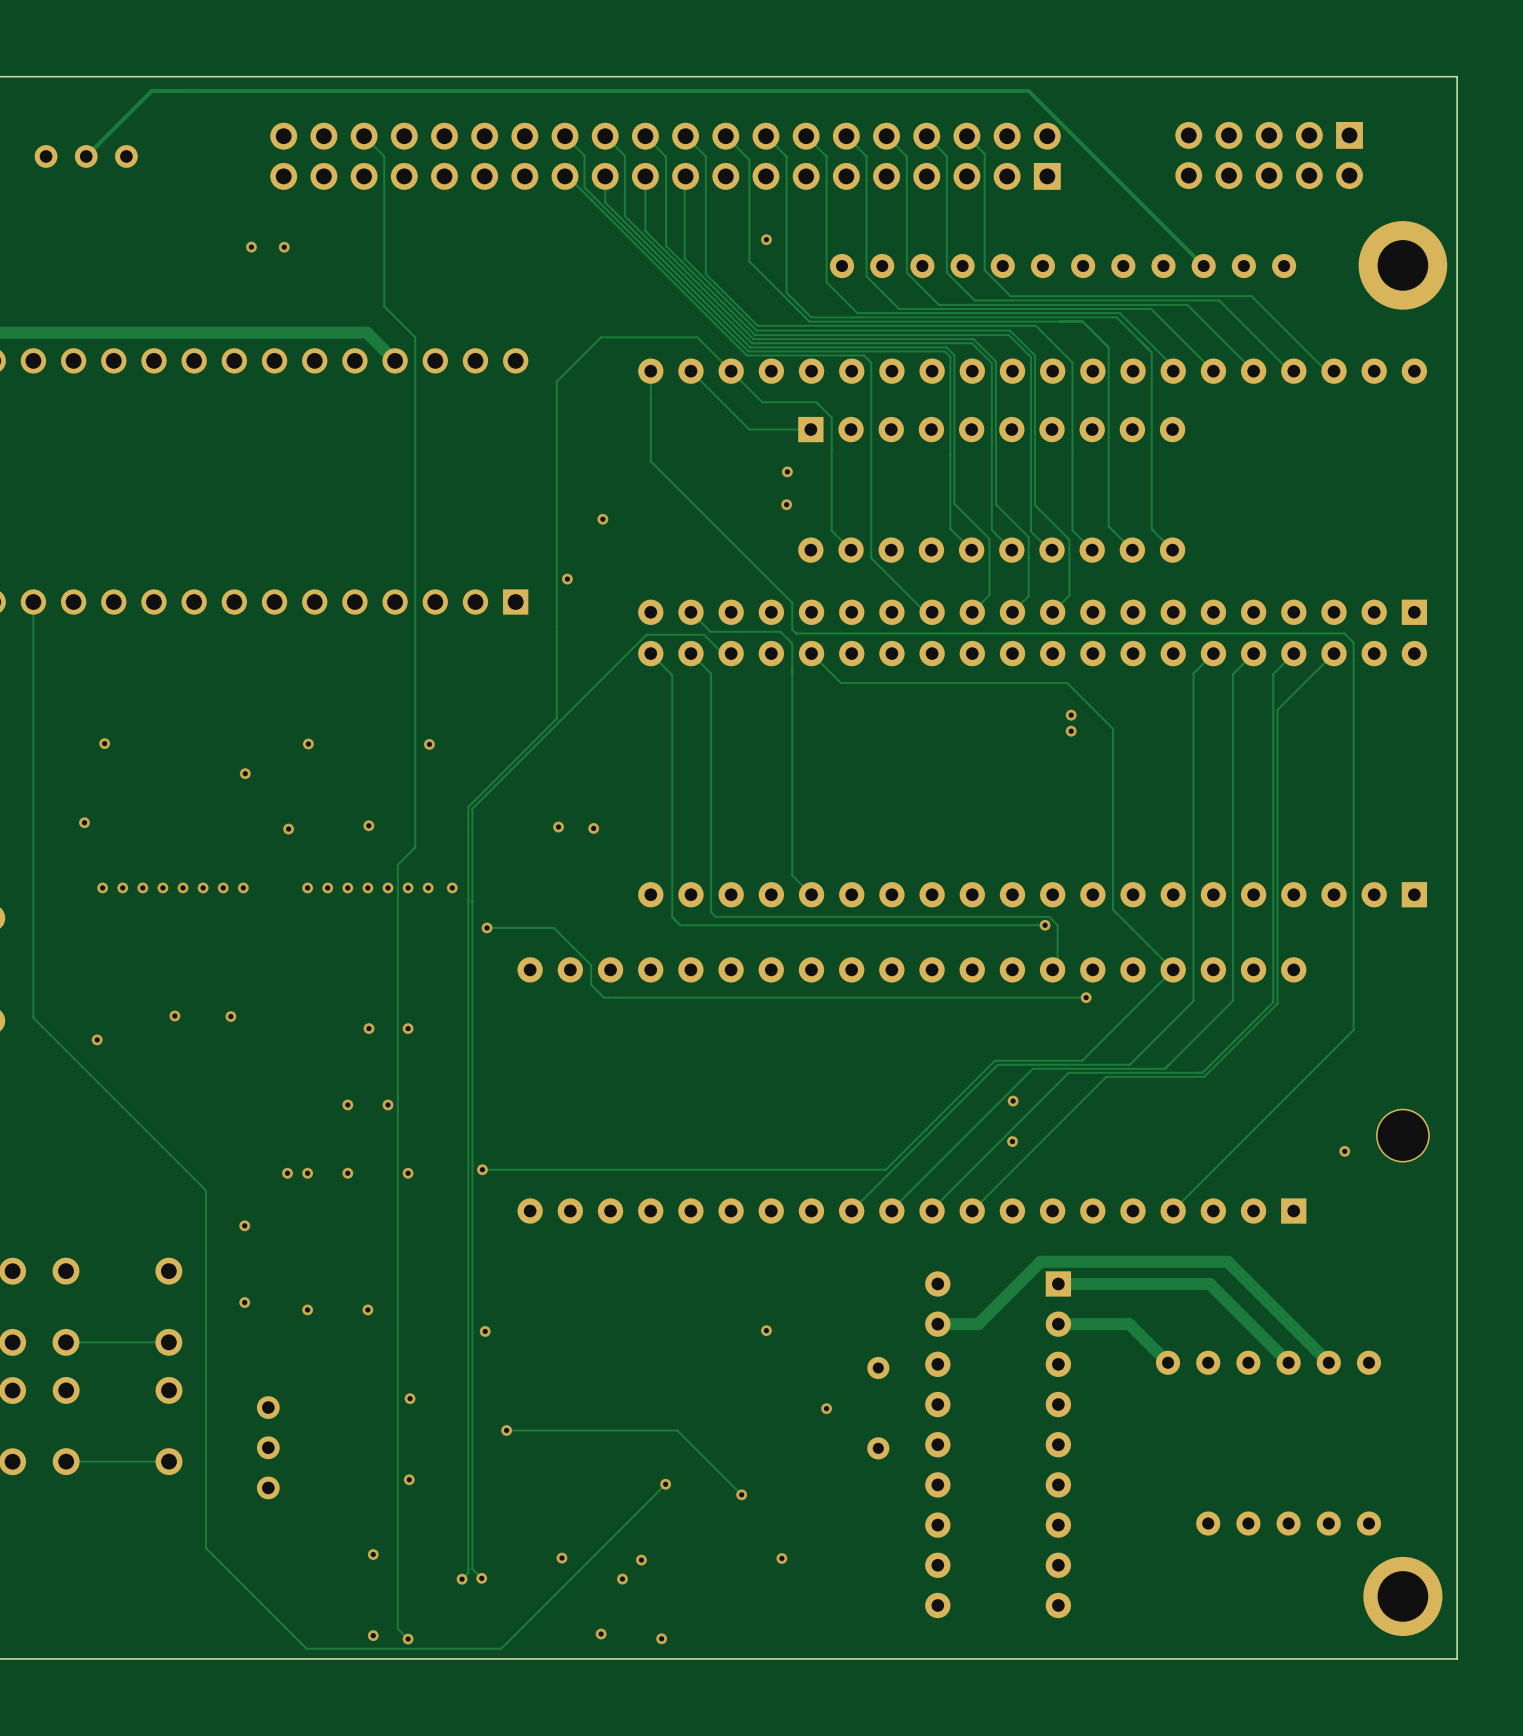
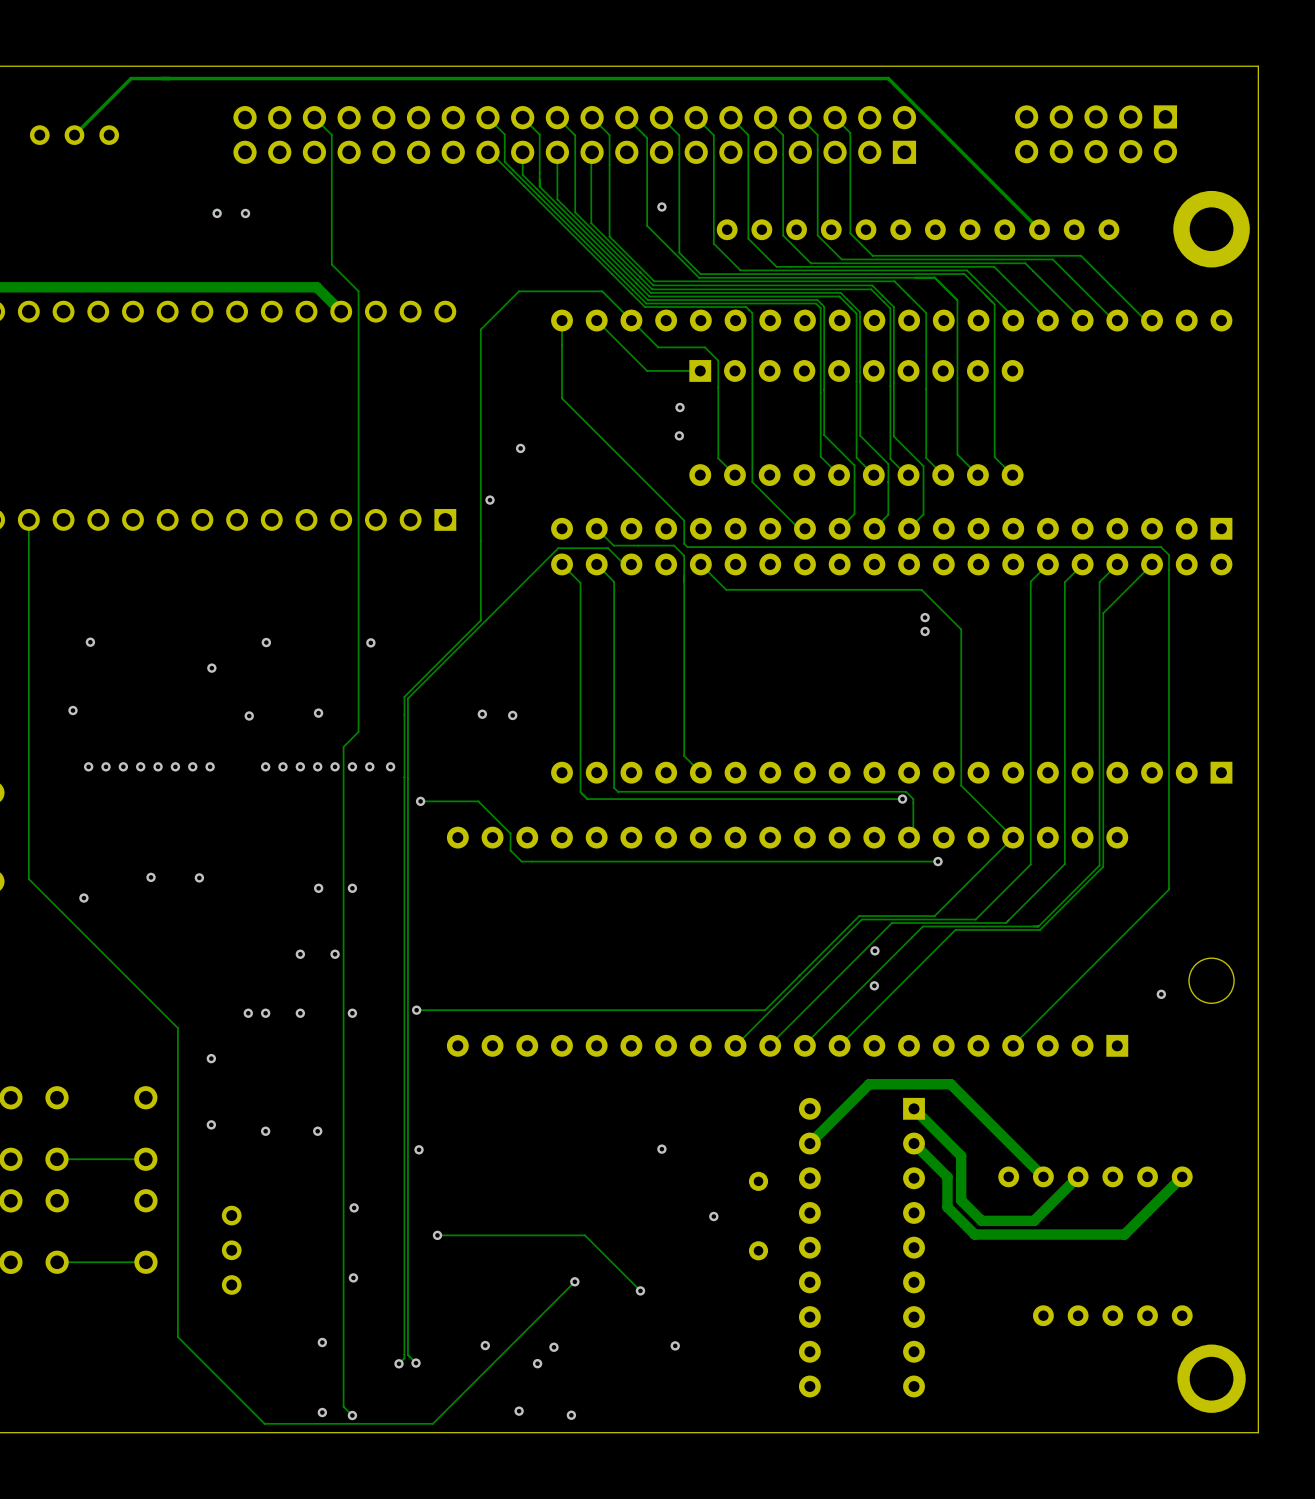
track: (1058, 1283) (1209, 1283) (1288, 1362) -> (914, 1108) (961, 1155) (961, 1200) (981, 1220) (1034, 1220) (1077, 1177)
track: (937, 1324) (978, 1324) (1040, 1261) (1227, 1261) (1328, 1362) -> (809, 1143) (869, 1084) (950, 1084) (1043, 1176)
track: (1058, 1324) (1129, 1324) (1168, 1362) -> (914, 1143) (947, 1177) (947, 1207) (974, 1234) (1124, 1234) (1182, 1176)

